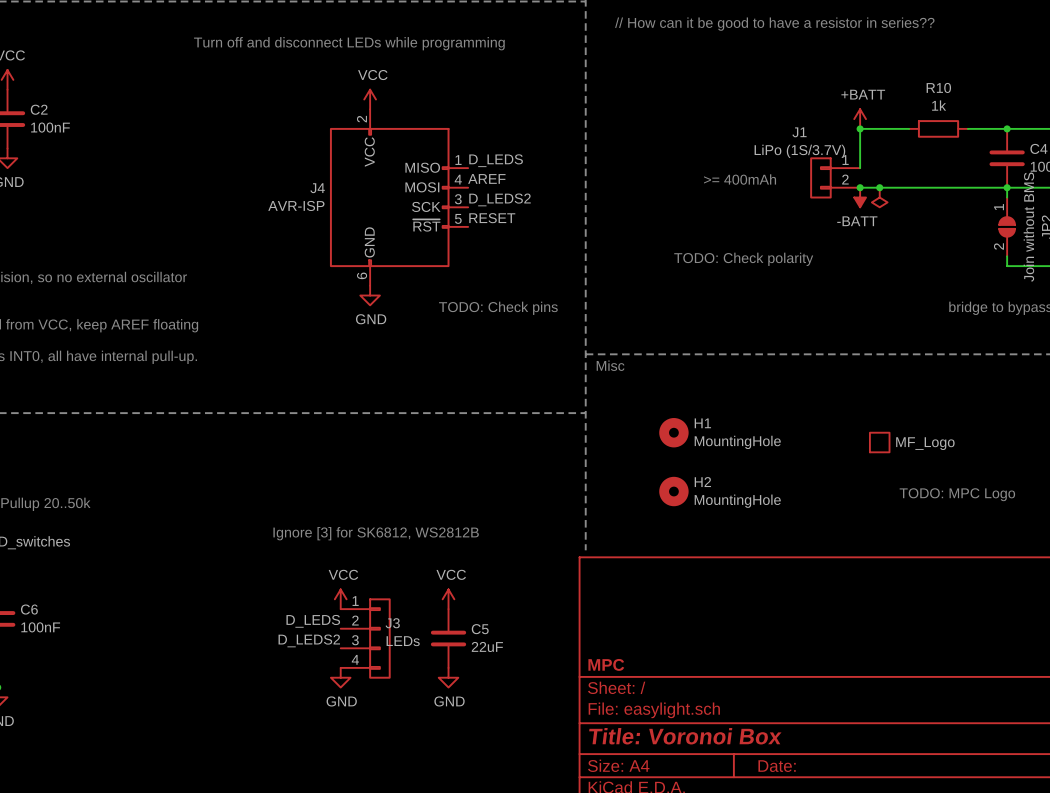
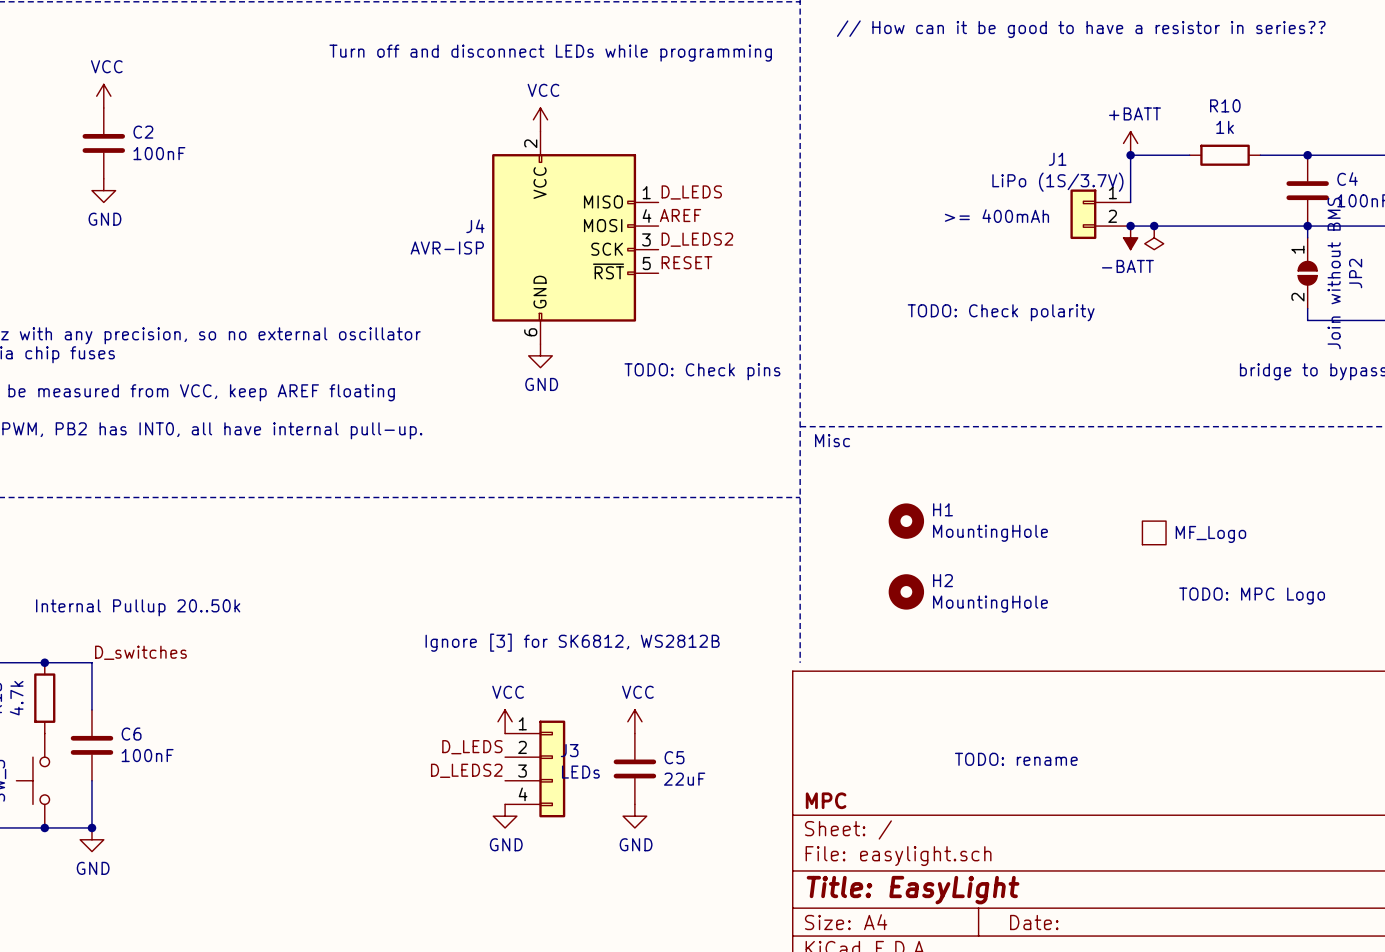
text: none -> TODO: rename (1016, 759)
title block: Title: Voronoi Box (685, 736) -> Title: EasyLight (913, 890)

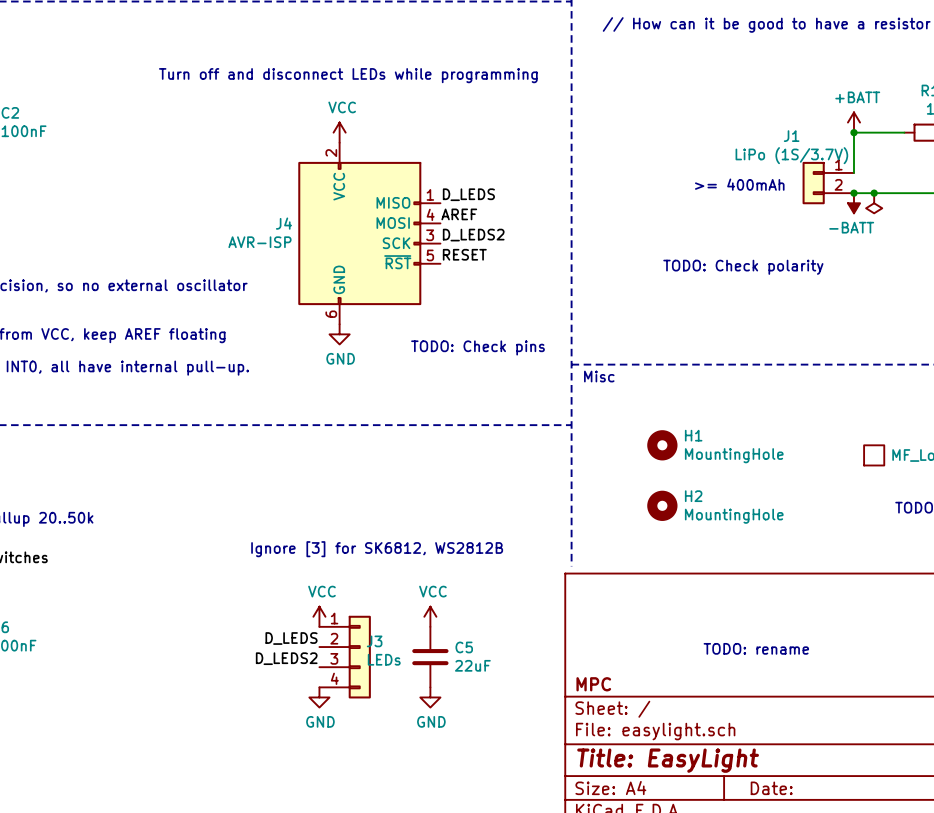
text position: Turn off and disconnect LEDs while programming (550, 53) -> Turn off and disconnect LEDs while programming (348, 75)
power symbol position: VCC (540, 119) -> VCC (339, 132)
label position: D_LEDS (691, 192) -> D_LEDS (468, 194)
label position: AREF (680, 215) -> AREF (459, 214)
J4 position: (575, 237) -> (369, 233)
label position: D_LEDS2 (697, 239) -> D_LEDS2 (473, 235)
label position: RESET (686, 262) -> RESET (464, 254)
power symbol position: GND (540, 355) -> GND (339, 334)
text position: TODO: Check pins (702, 371) -> TODO: Check pins (478, 347)

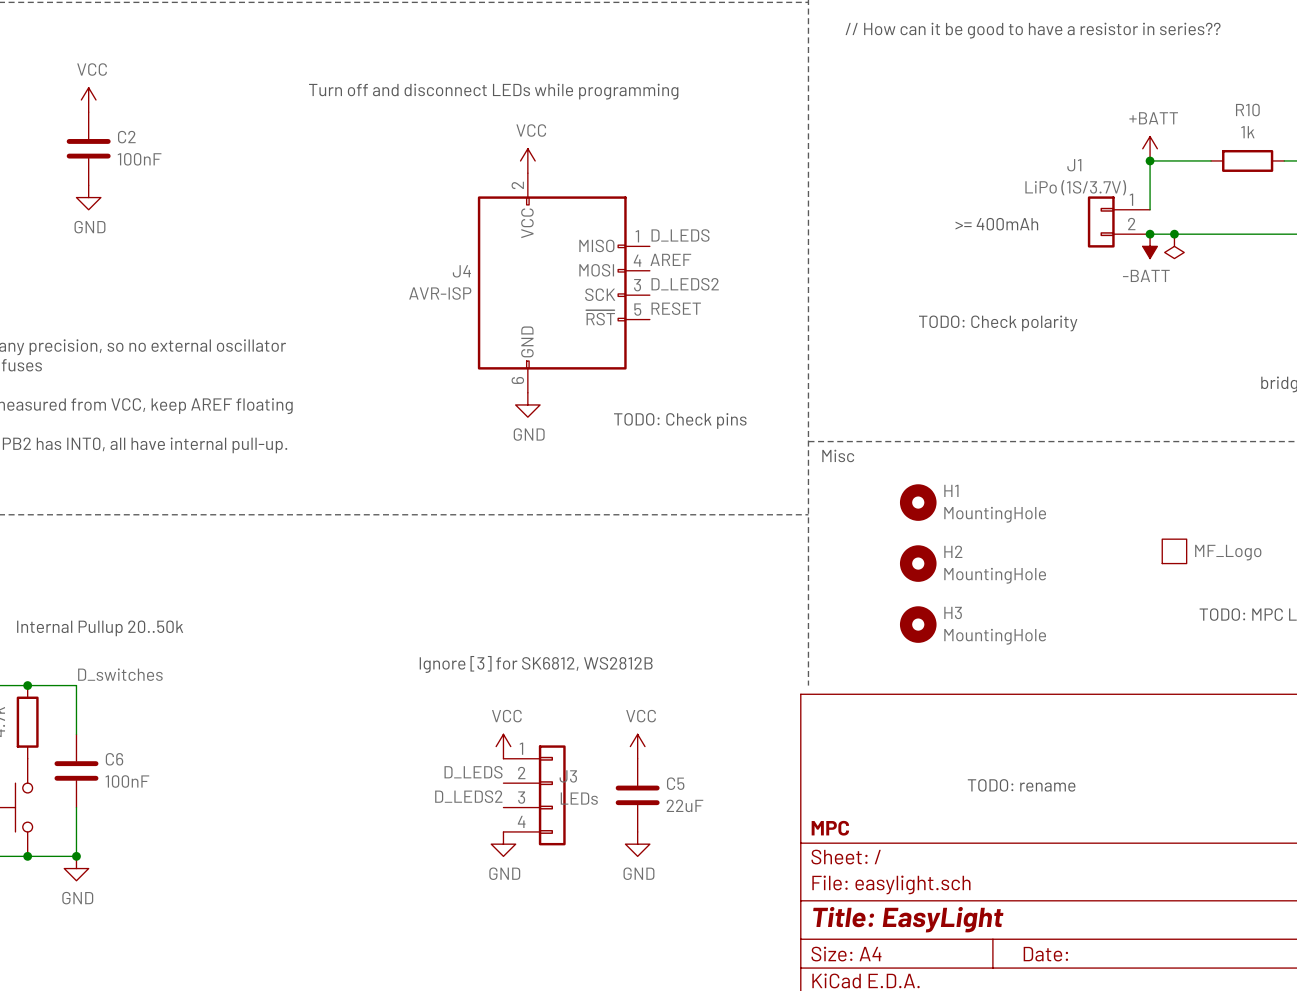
H1 position: (662, 445) -> (918, 502)
H2 position: (662, 505) -> (918, 563)
H3: none -> MountingHole (918, 624)

